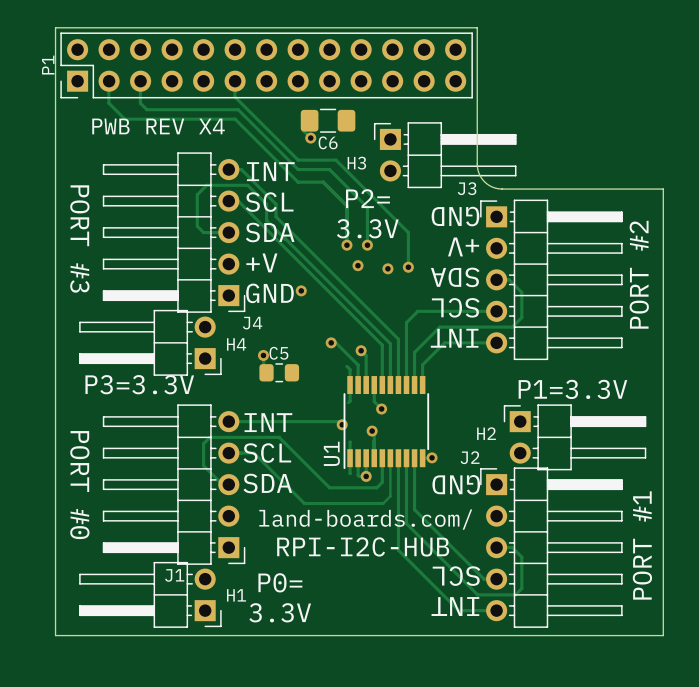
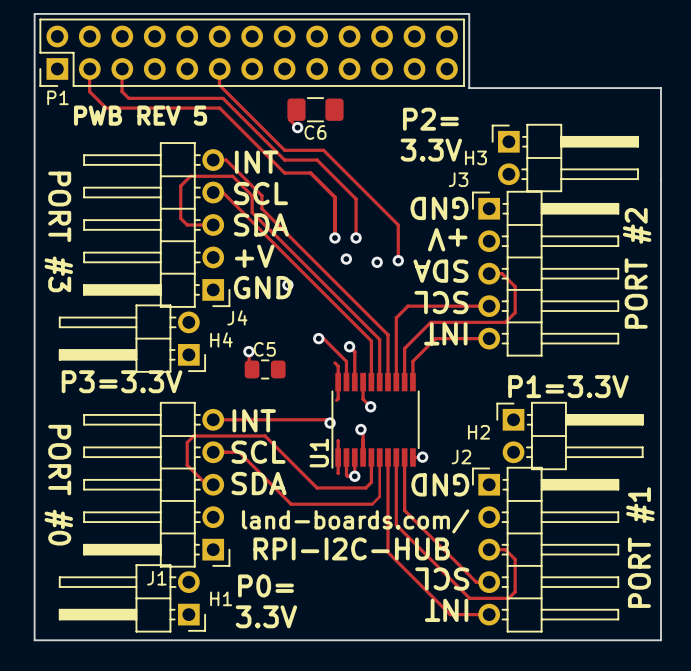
P1 name rotation: 0° (48, 65) -> 90° clockwise (57, 97)
P1 name position: P1 (48, 65) -> P1 (57, 97)
board edge: (477, 99) (477, 167) (482, 179) (492, 187) (502, 189) (663, 189) -> (469, 88) (660, 88) (660, 180)
text: PWB REV X4 (158, 126) -> PWB REV 5 (140, 115)
H3 position: (445, 155) -> (565, 158)
H3 name position: H3 (356, 163) -> H3 (475, 157)
text position: P2= (367, 198) -> P2= (430, 119)
text position: 3.3V (367, 228) -> 3.3V (431, 150)

